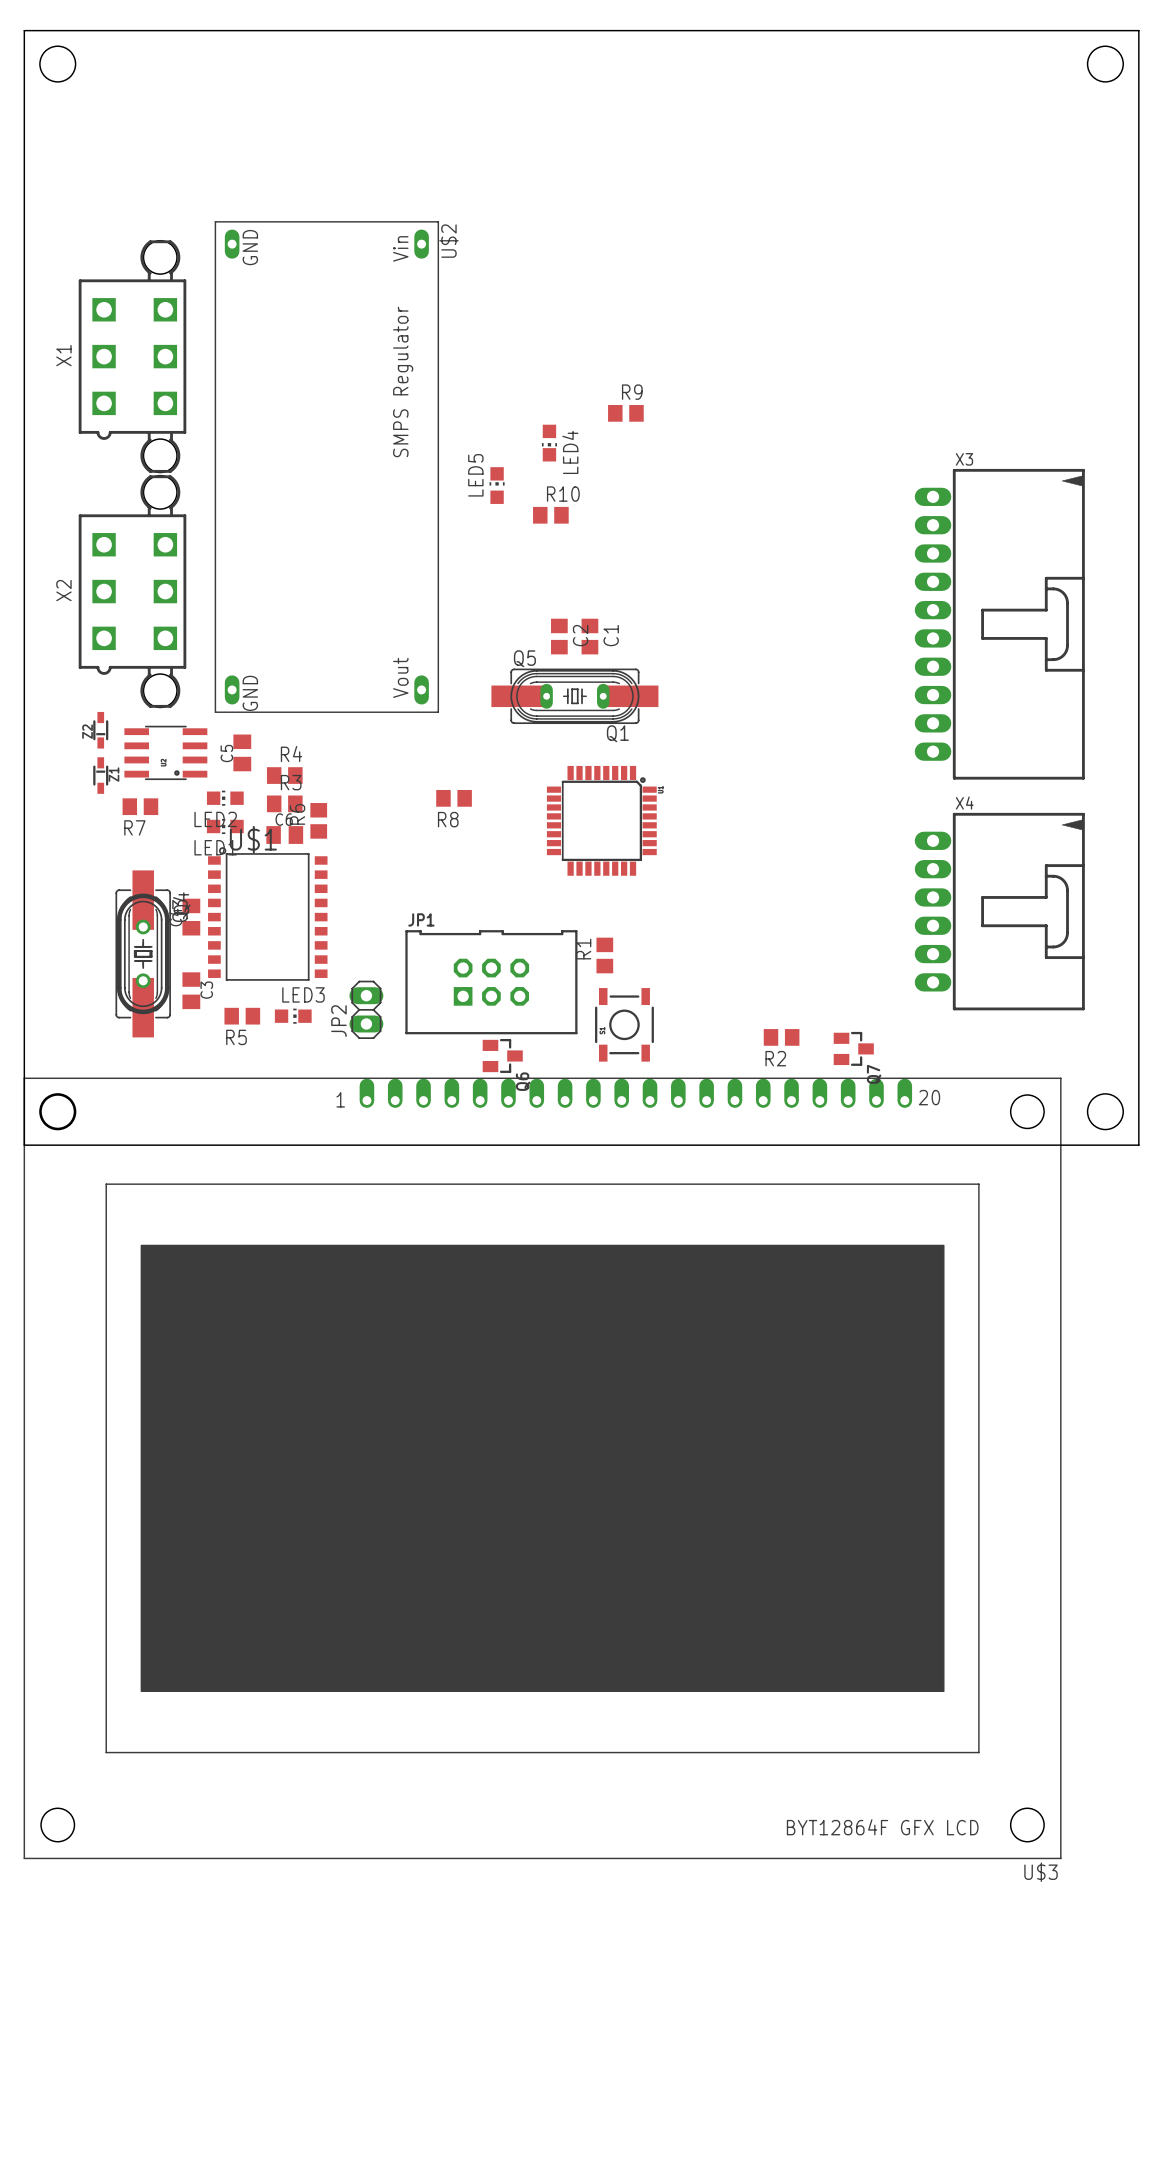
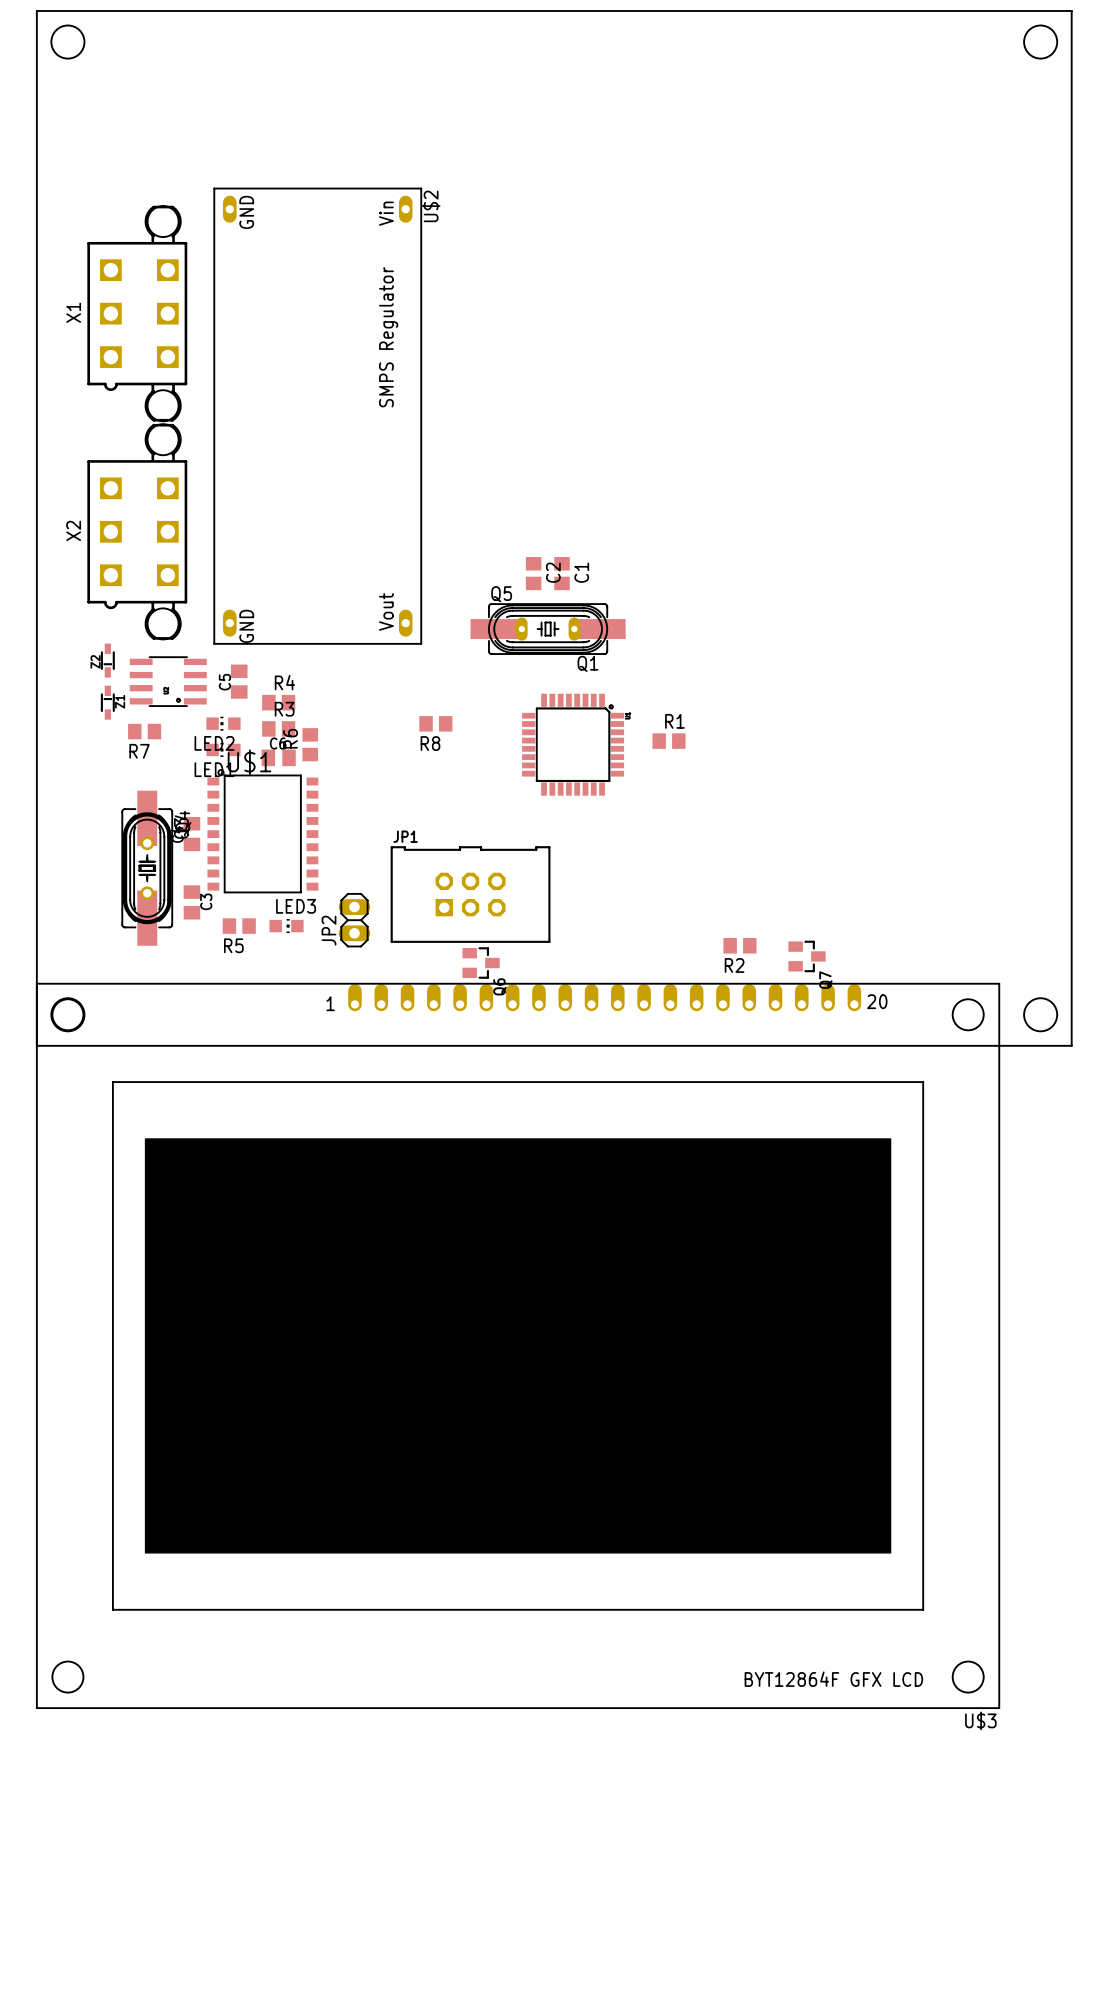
R9: (625, 413) -> none
LED4: (549, 443) -> none
LED5: (497, 485) -> none
R10: (550, 515) -> none
X3: (999, 624) -> none
X4: (999, 911) -> none
R1 rotation: 0° (604, 955) -> 90° clockwise (669, 741)
R1 position: (604, 955) -> (669, 741)
part: (624, 1024) -> none

